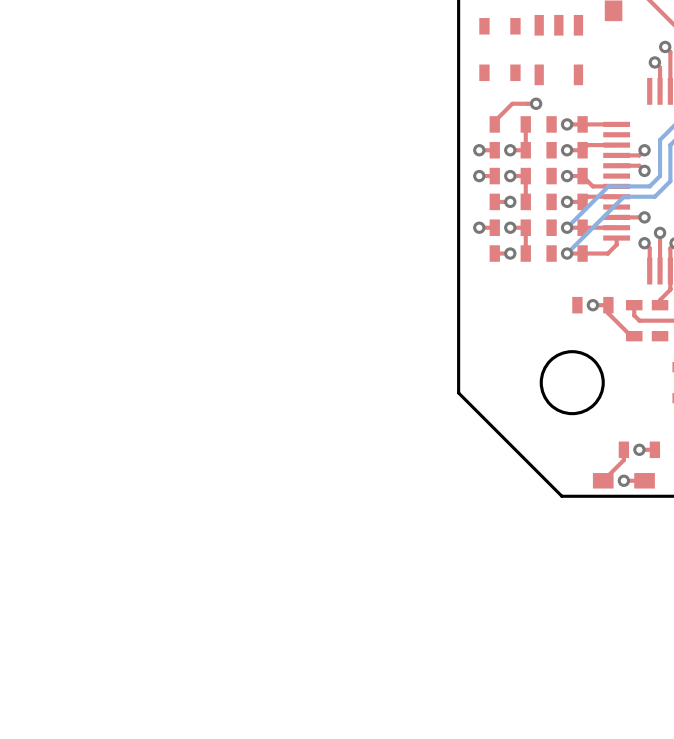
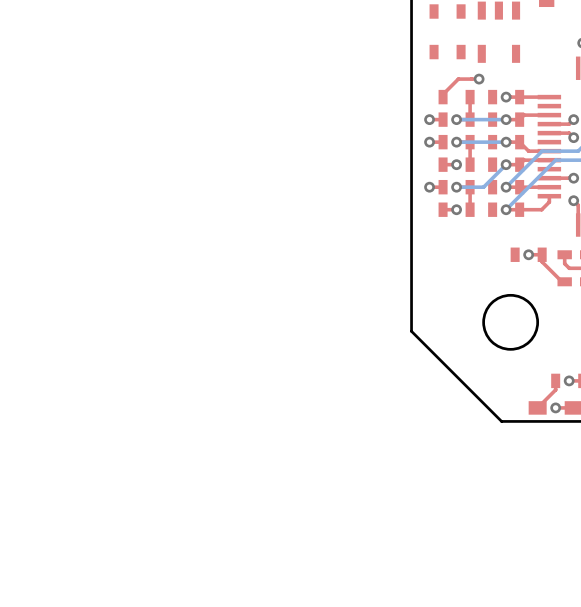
bottom track: none -> (506, 119) (456, 119)
bottom track: none -> (506, 142) (456, 142)
bottom track: none -> (506, 164) (483, 187) (456, 187)

